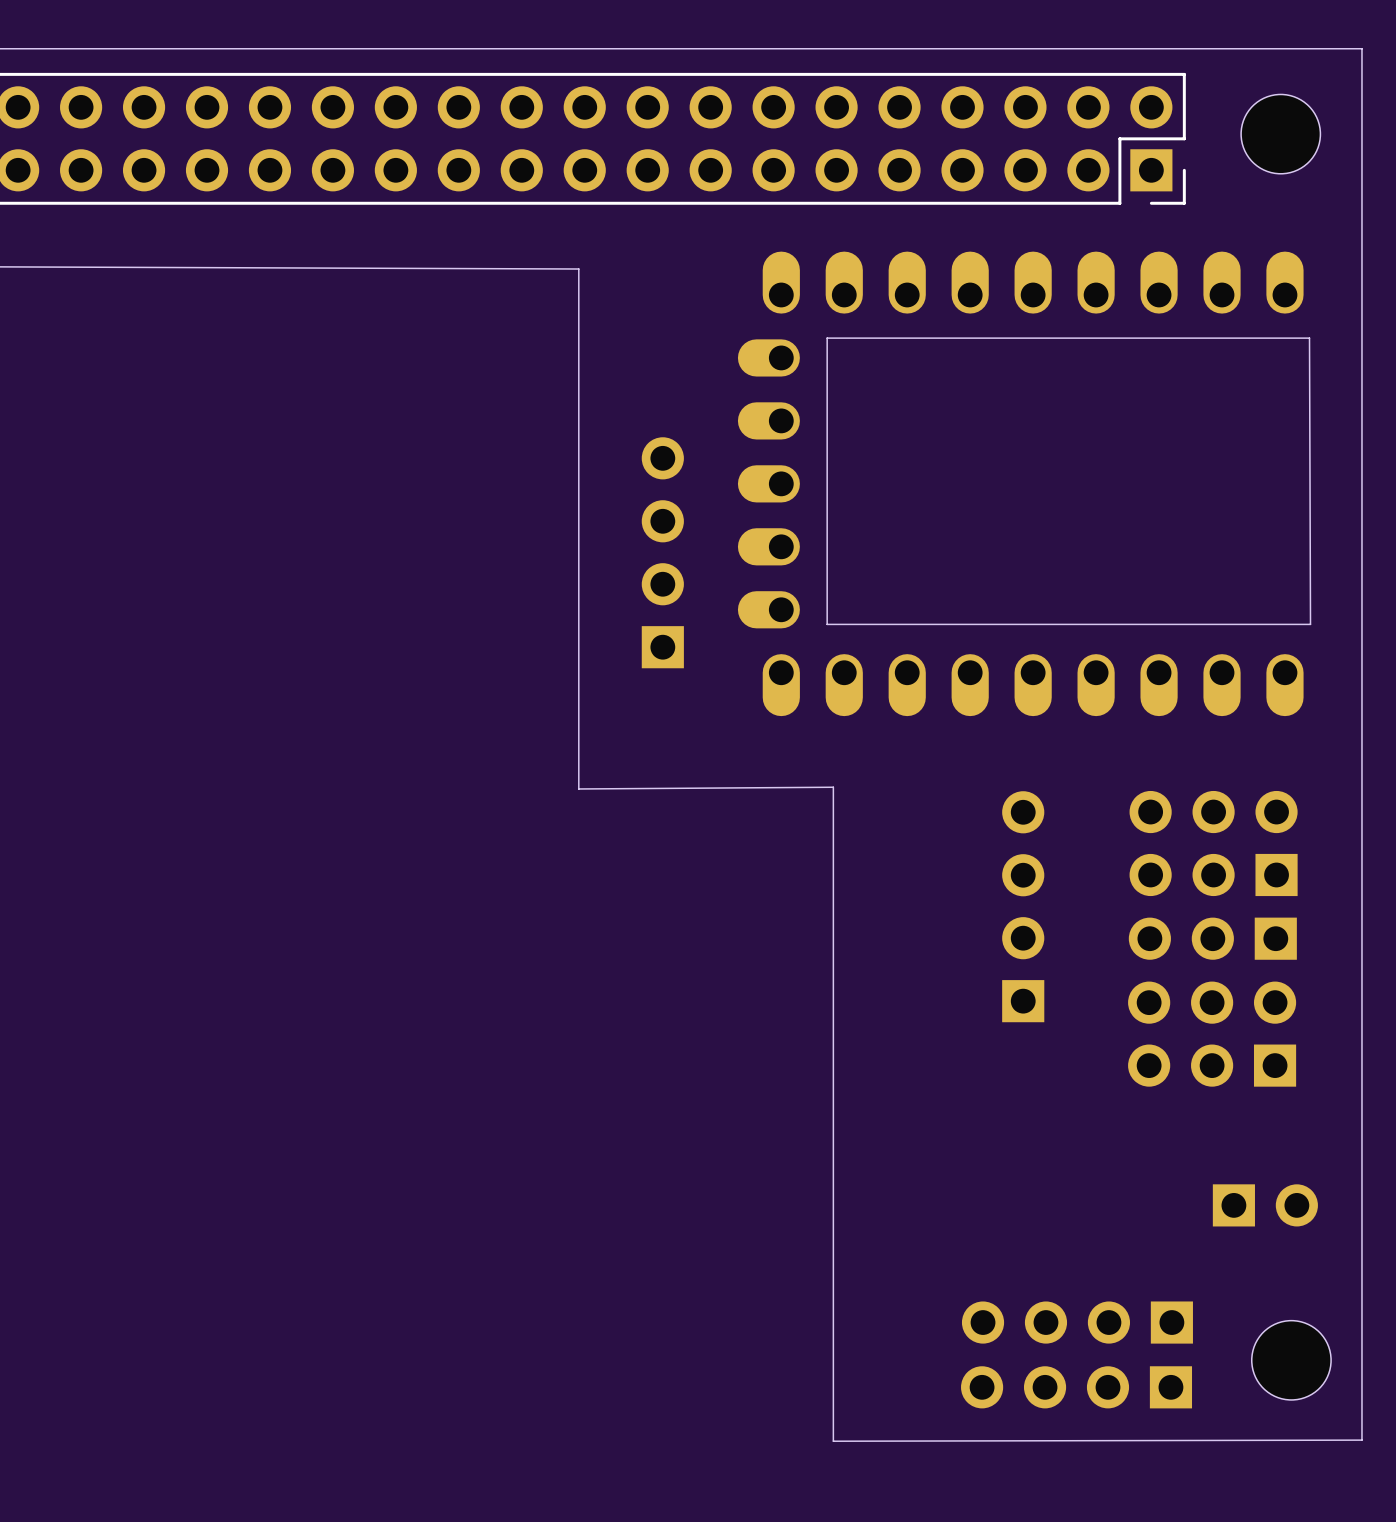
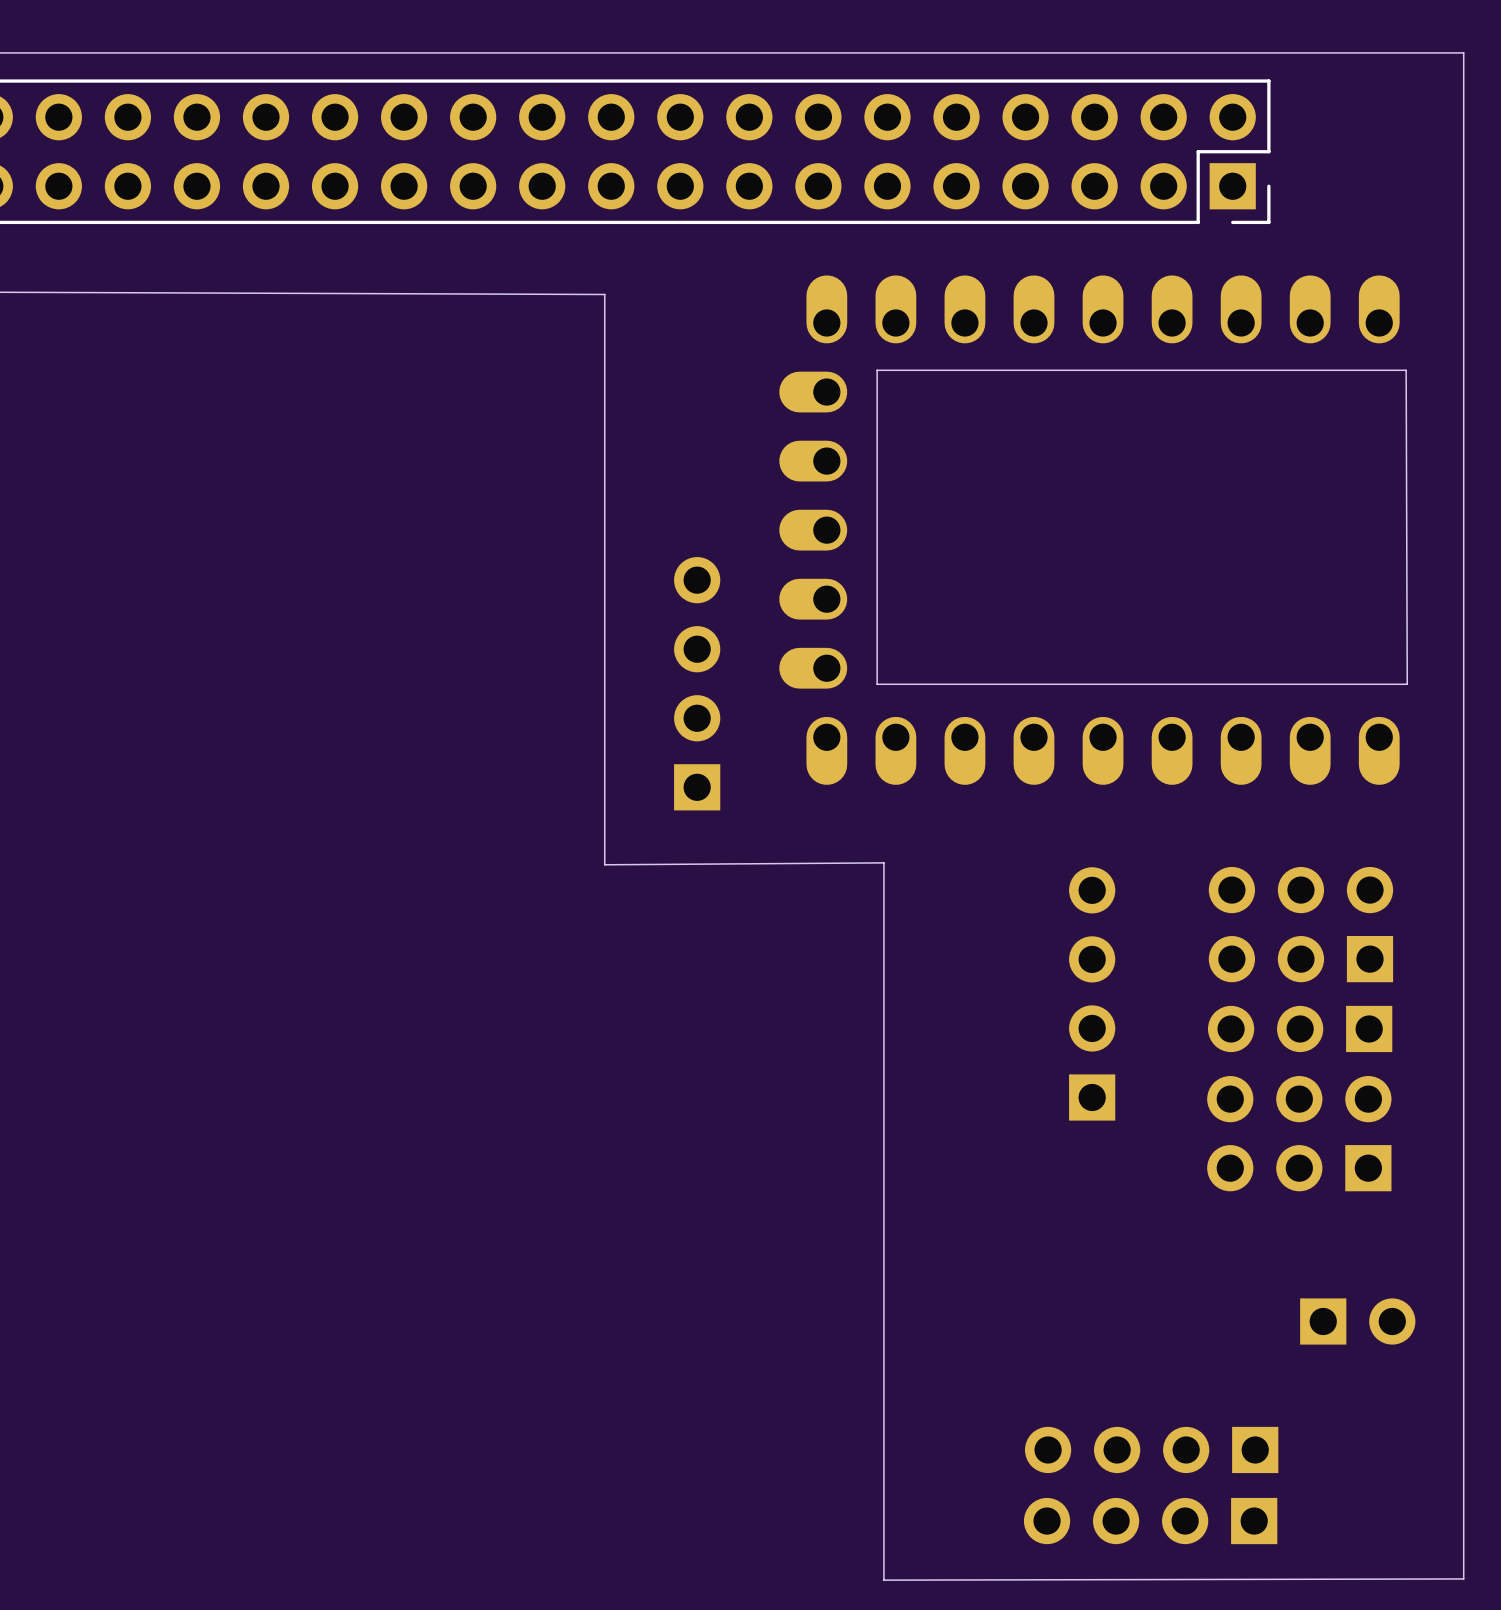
part: (1280, 134) -> none
part position: (662, 552) -> (697, 683)
part: (1291, 1360) -> none

